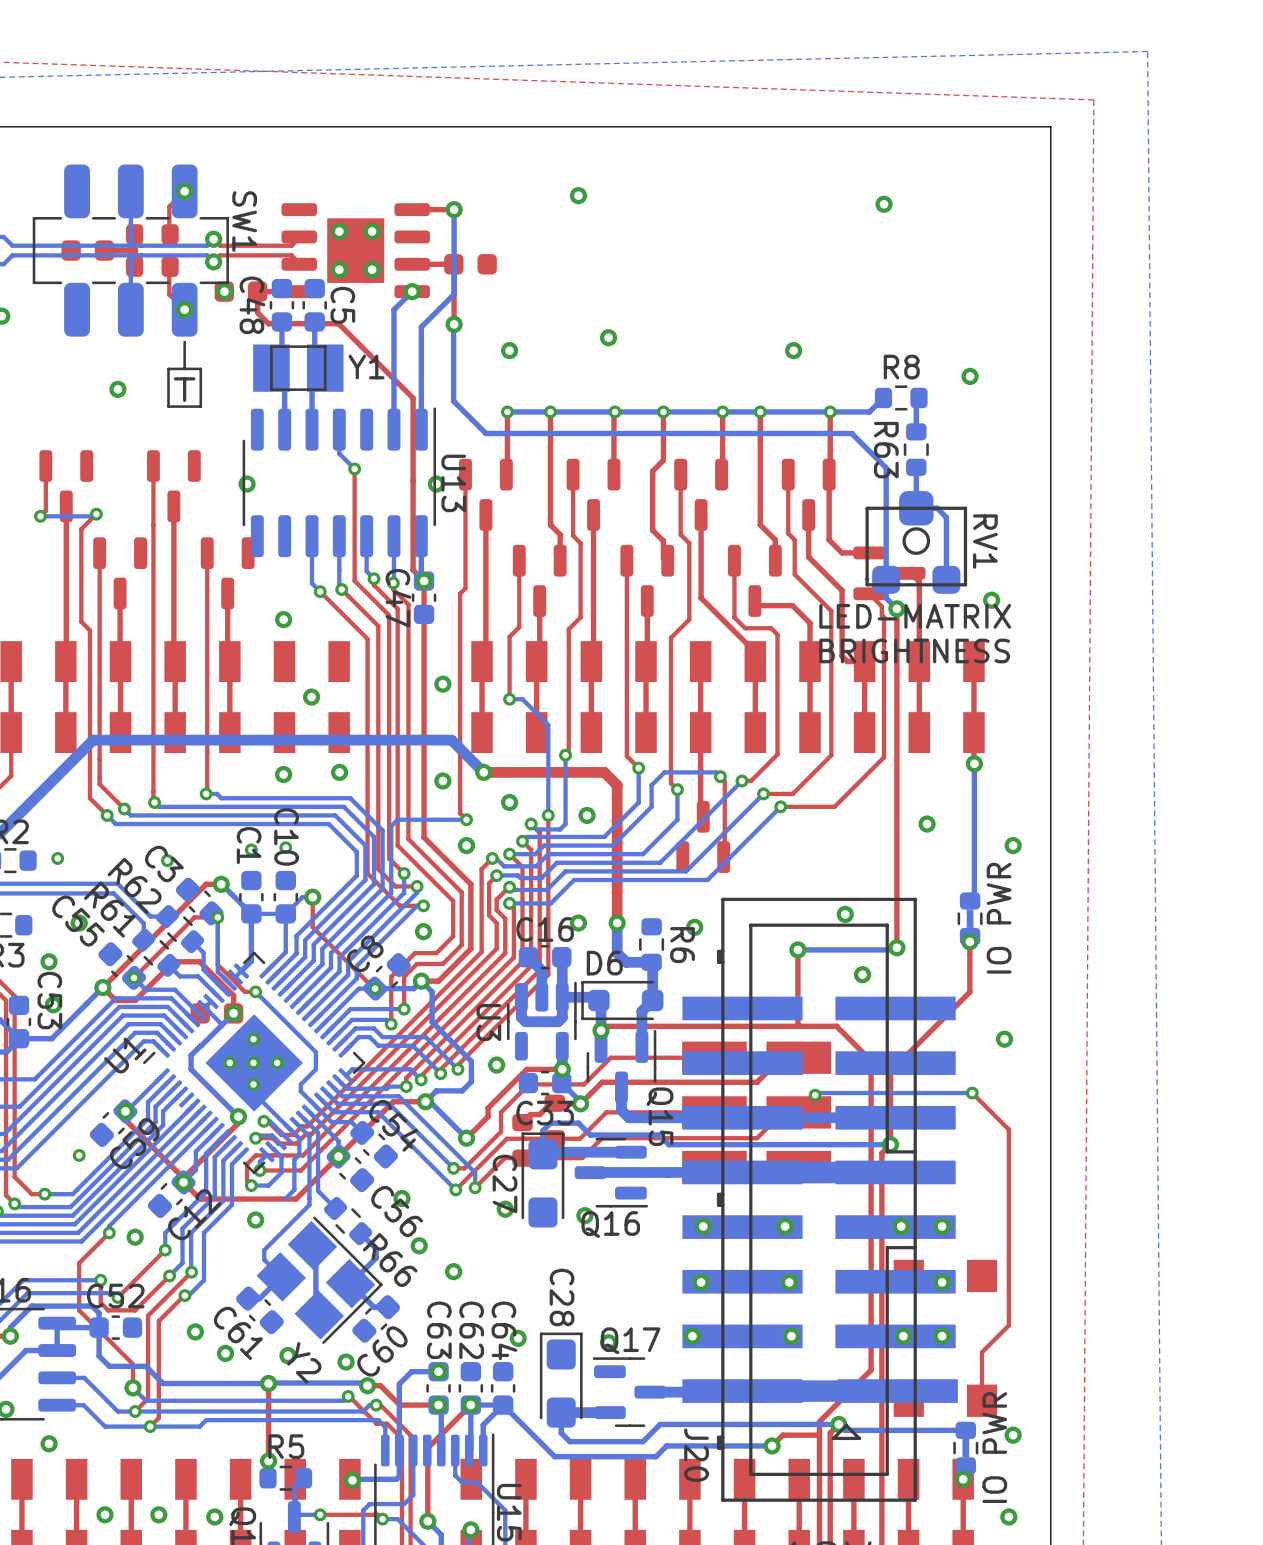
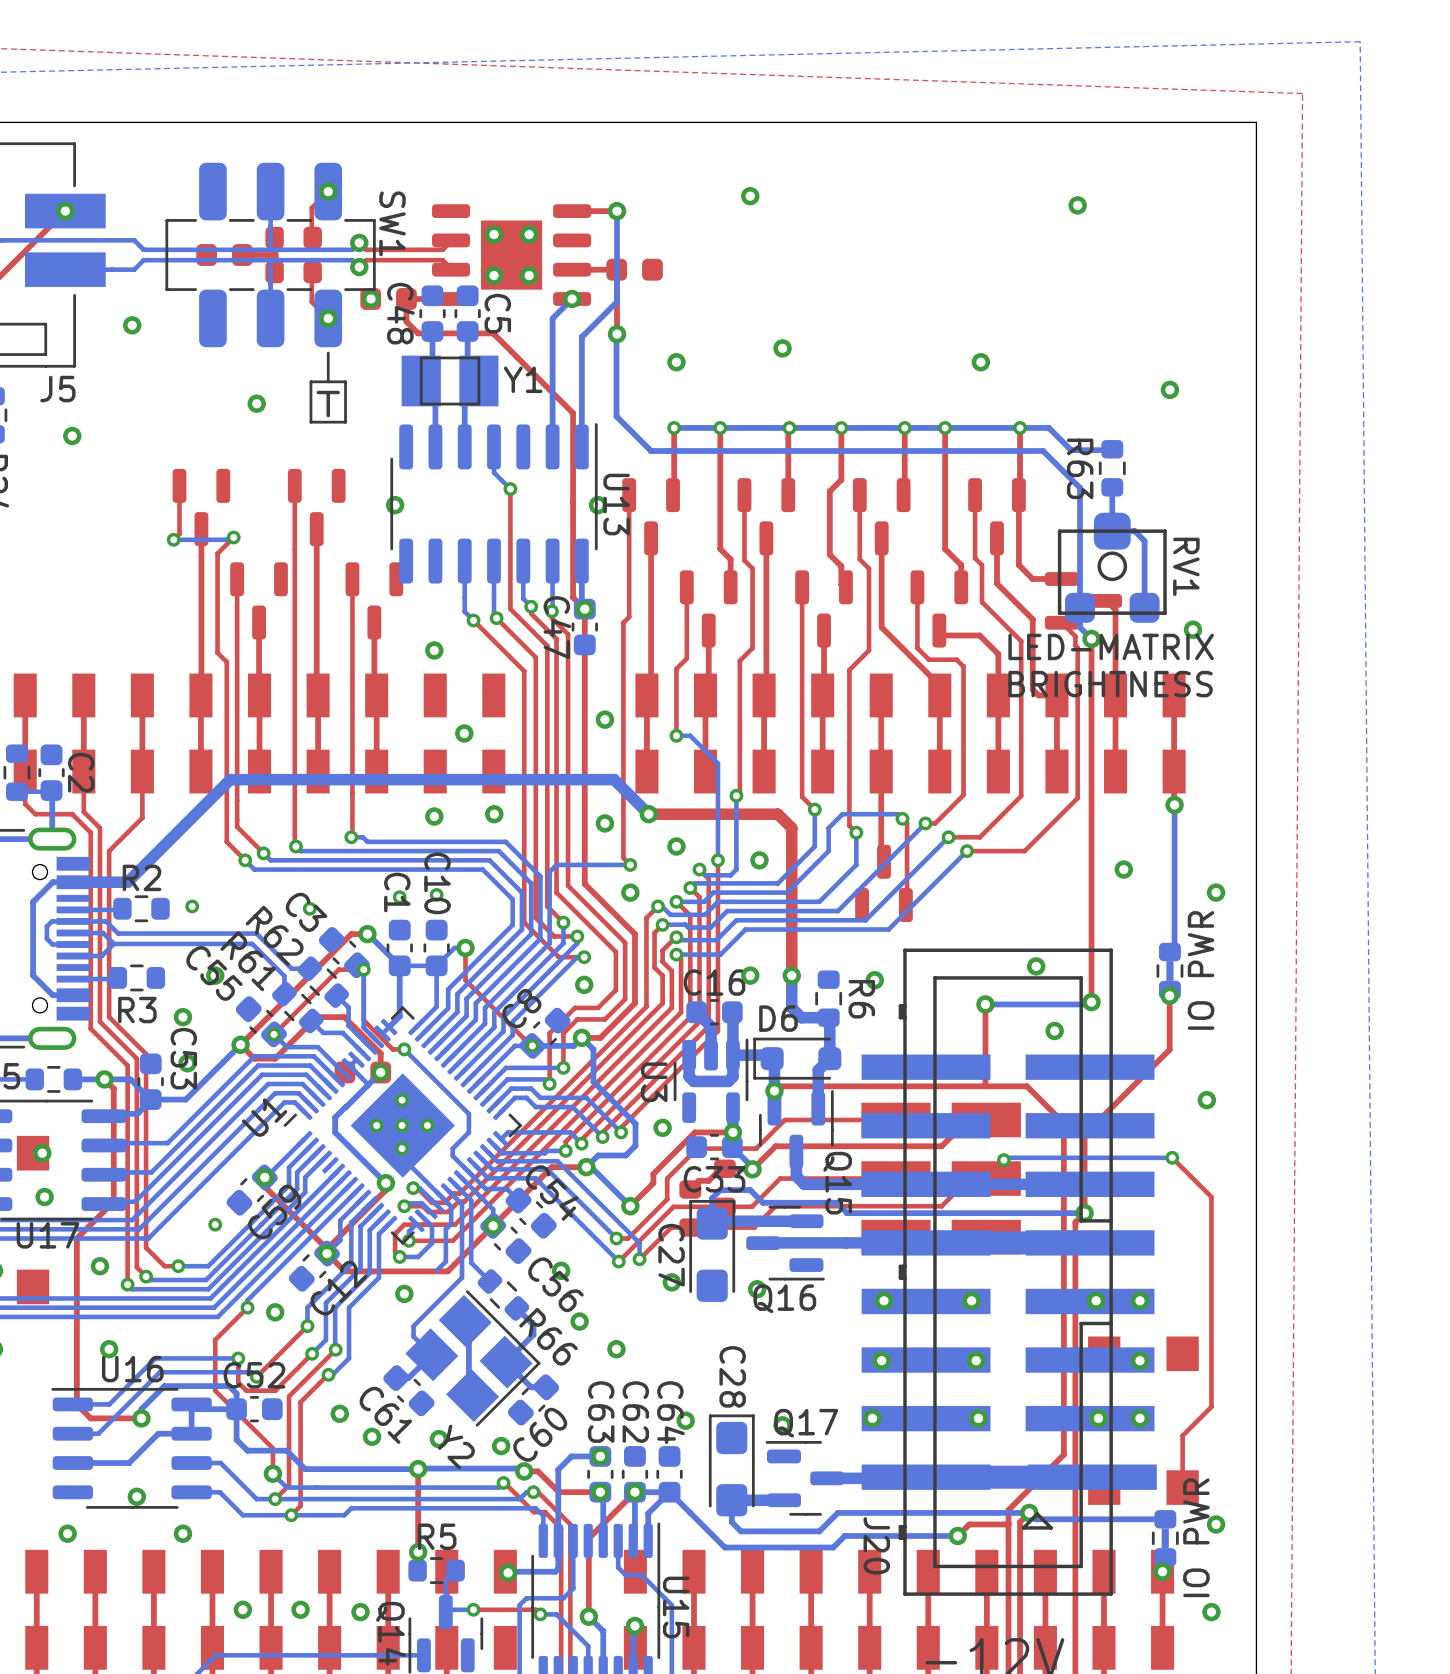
bottom track: (883, 397) (869, 411) (857, 411) -> (1112, 450) (1071, 450) (1048, 427)
R8: (901, 397) -> none
bottom track: (918, 397) (916, 400) (916, 431) -> none

